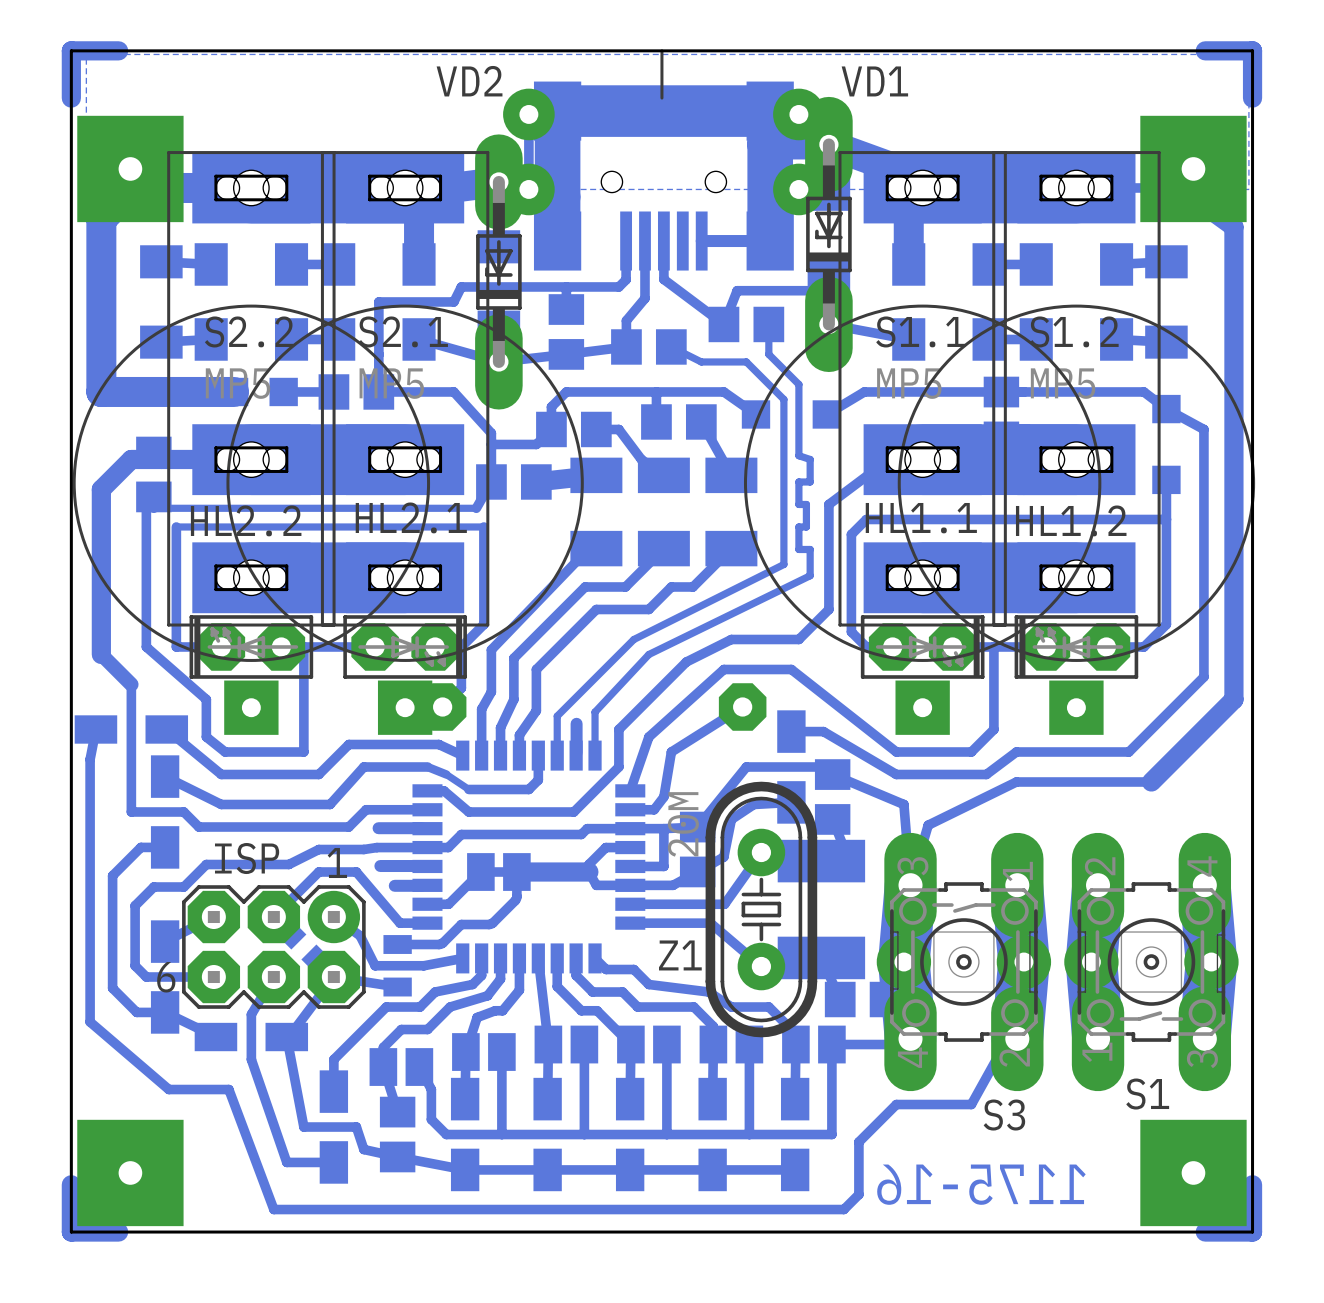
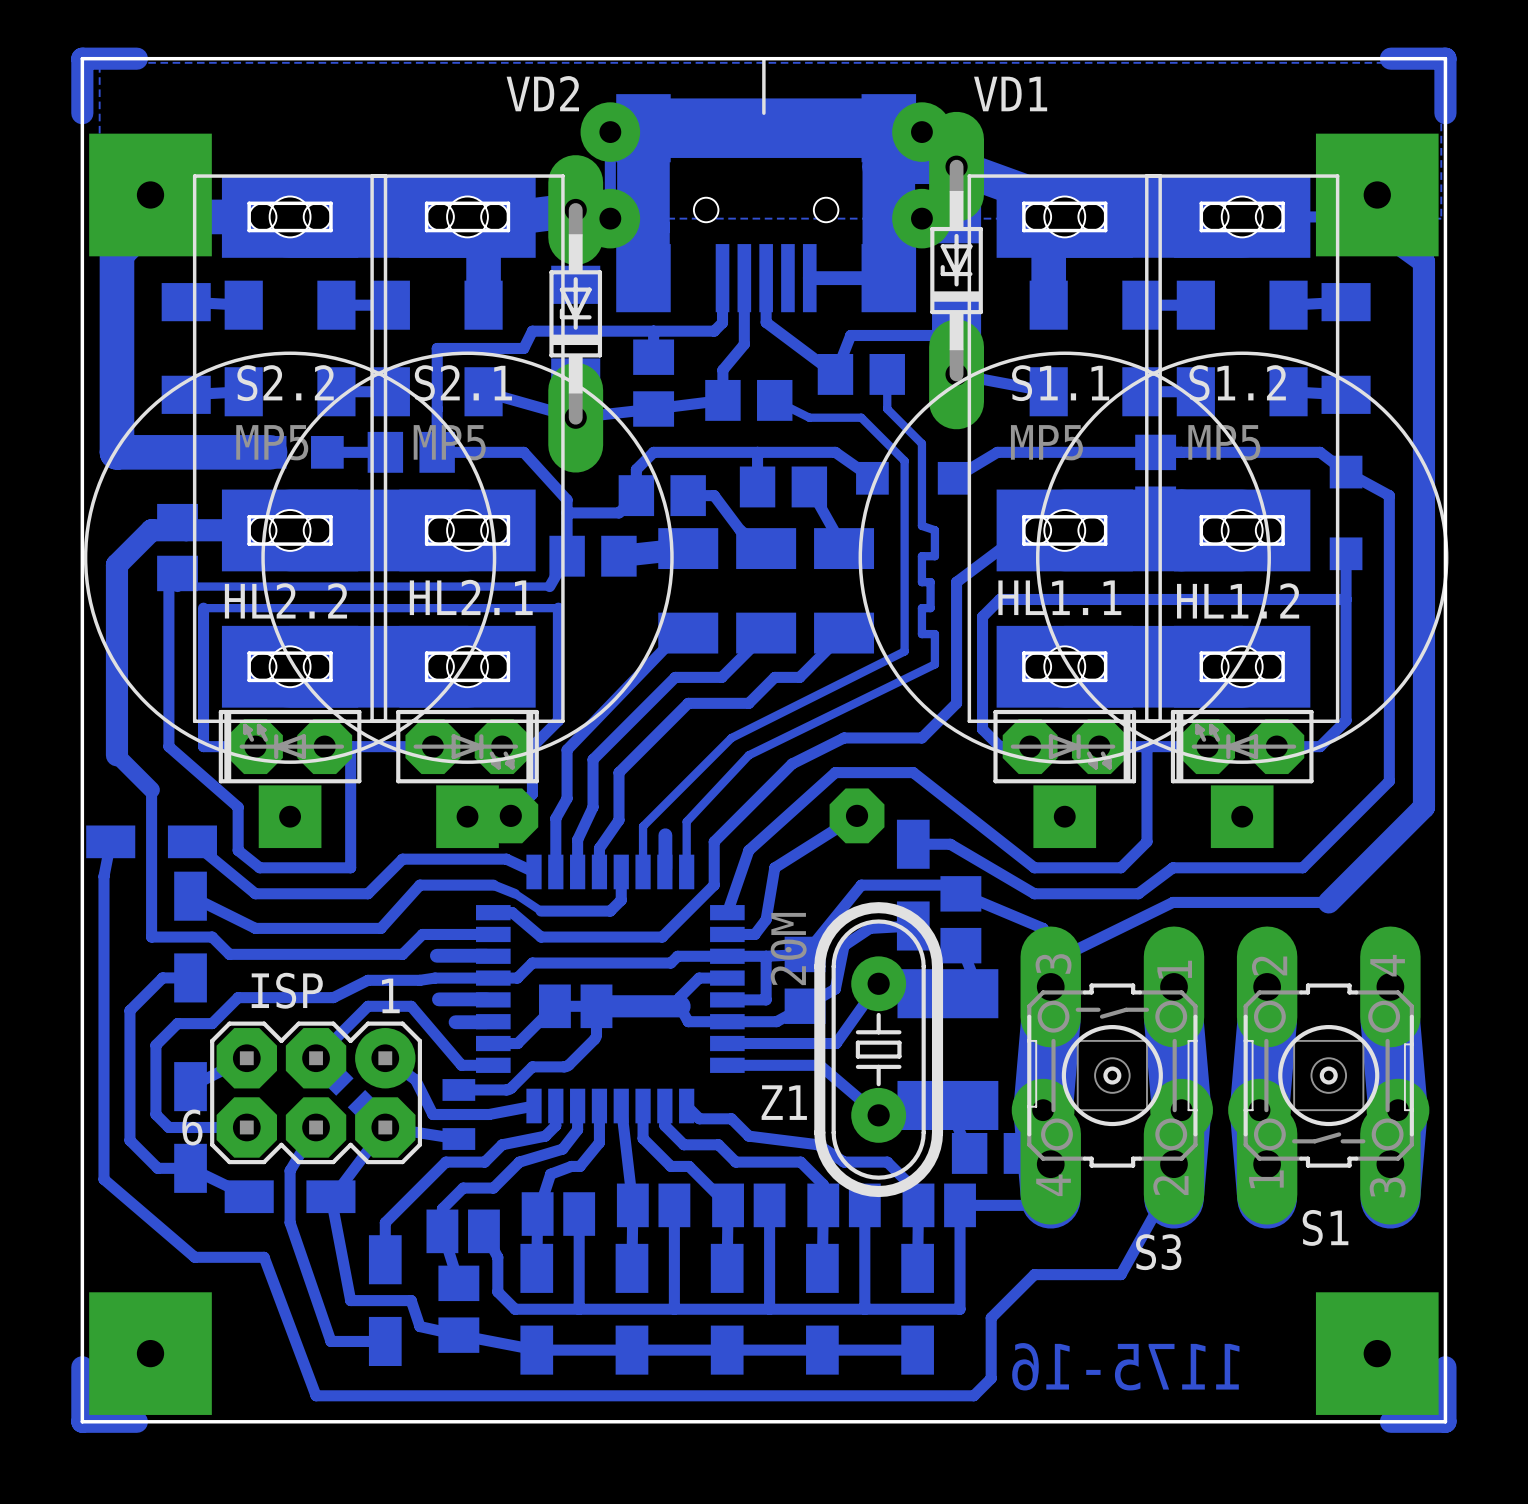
S3 position: (963, 962) -> (1112, 1075)
S1 position: (1151, 962) -> (1328, 1075)

